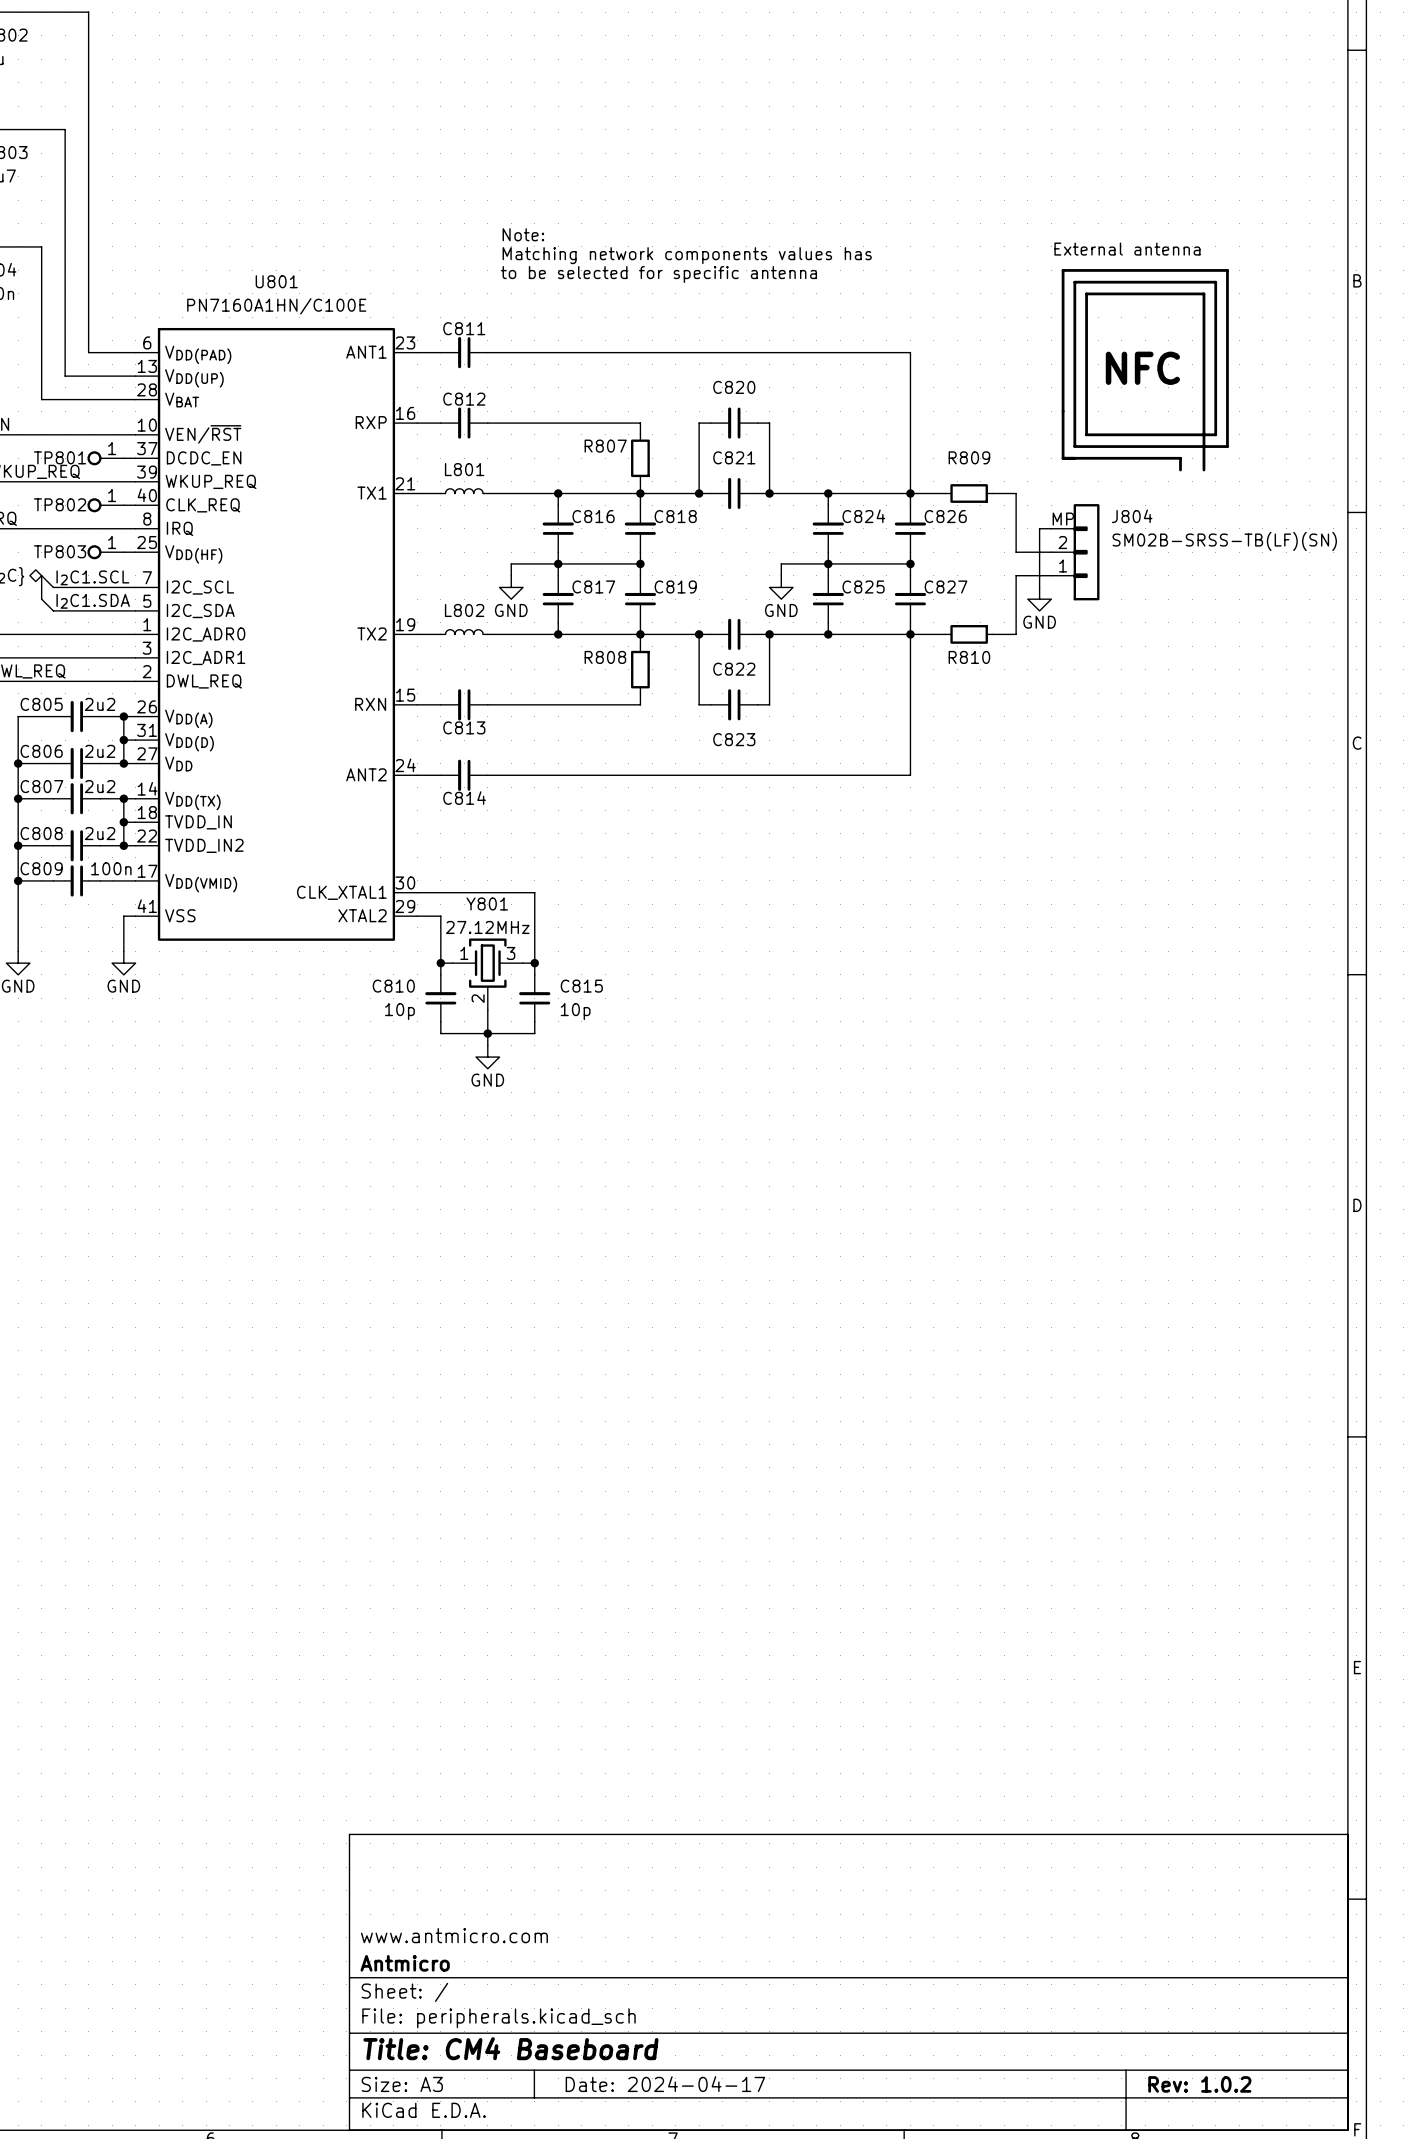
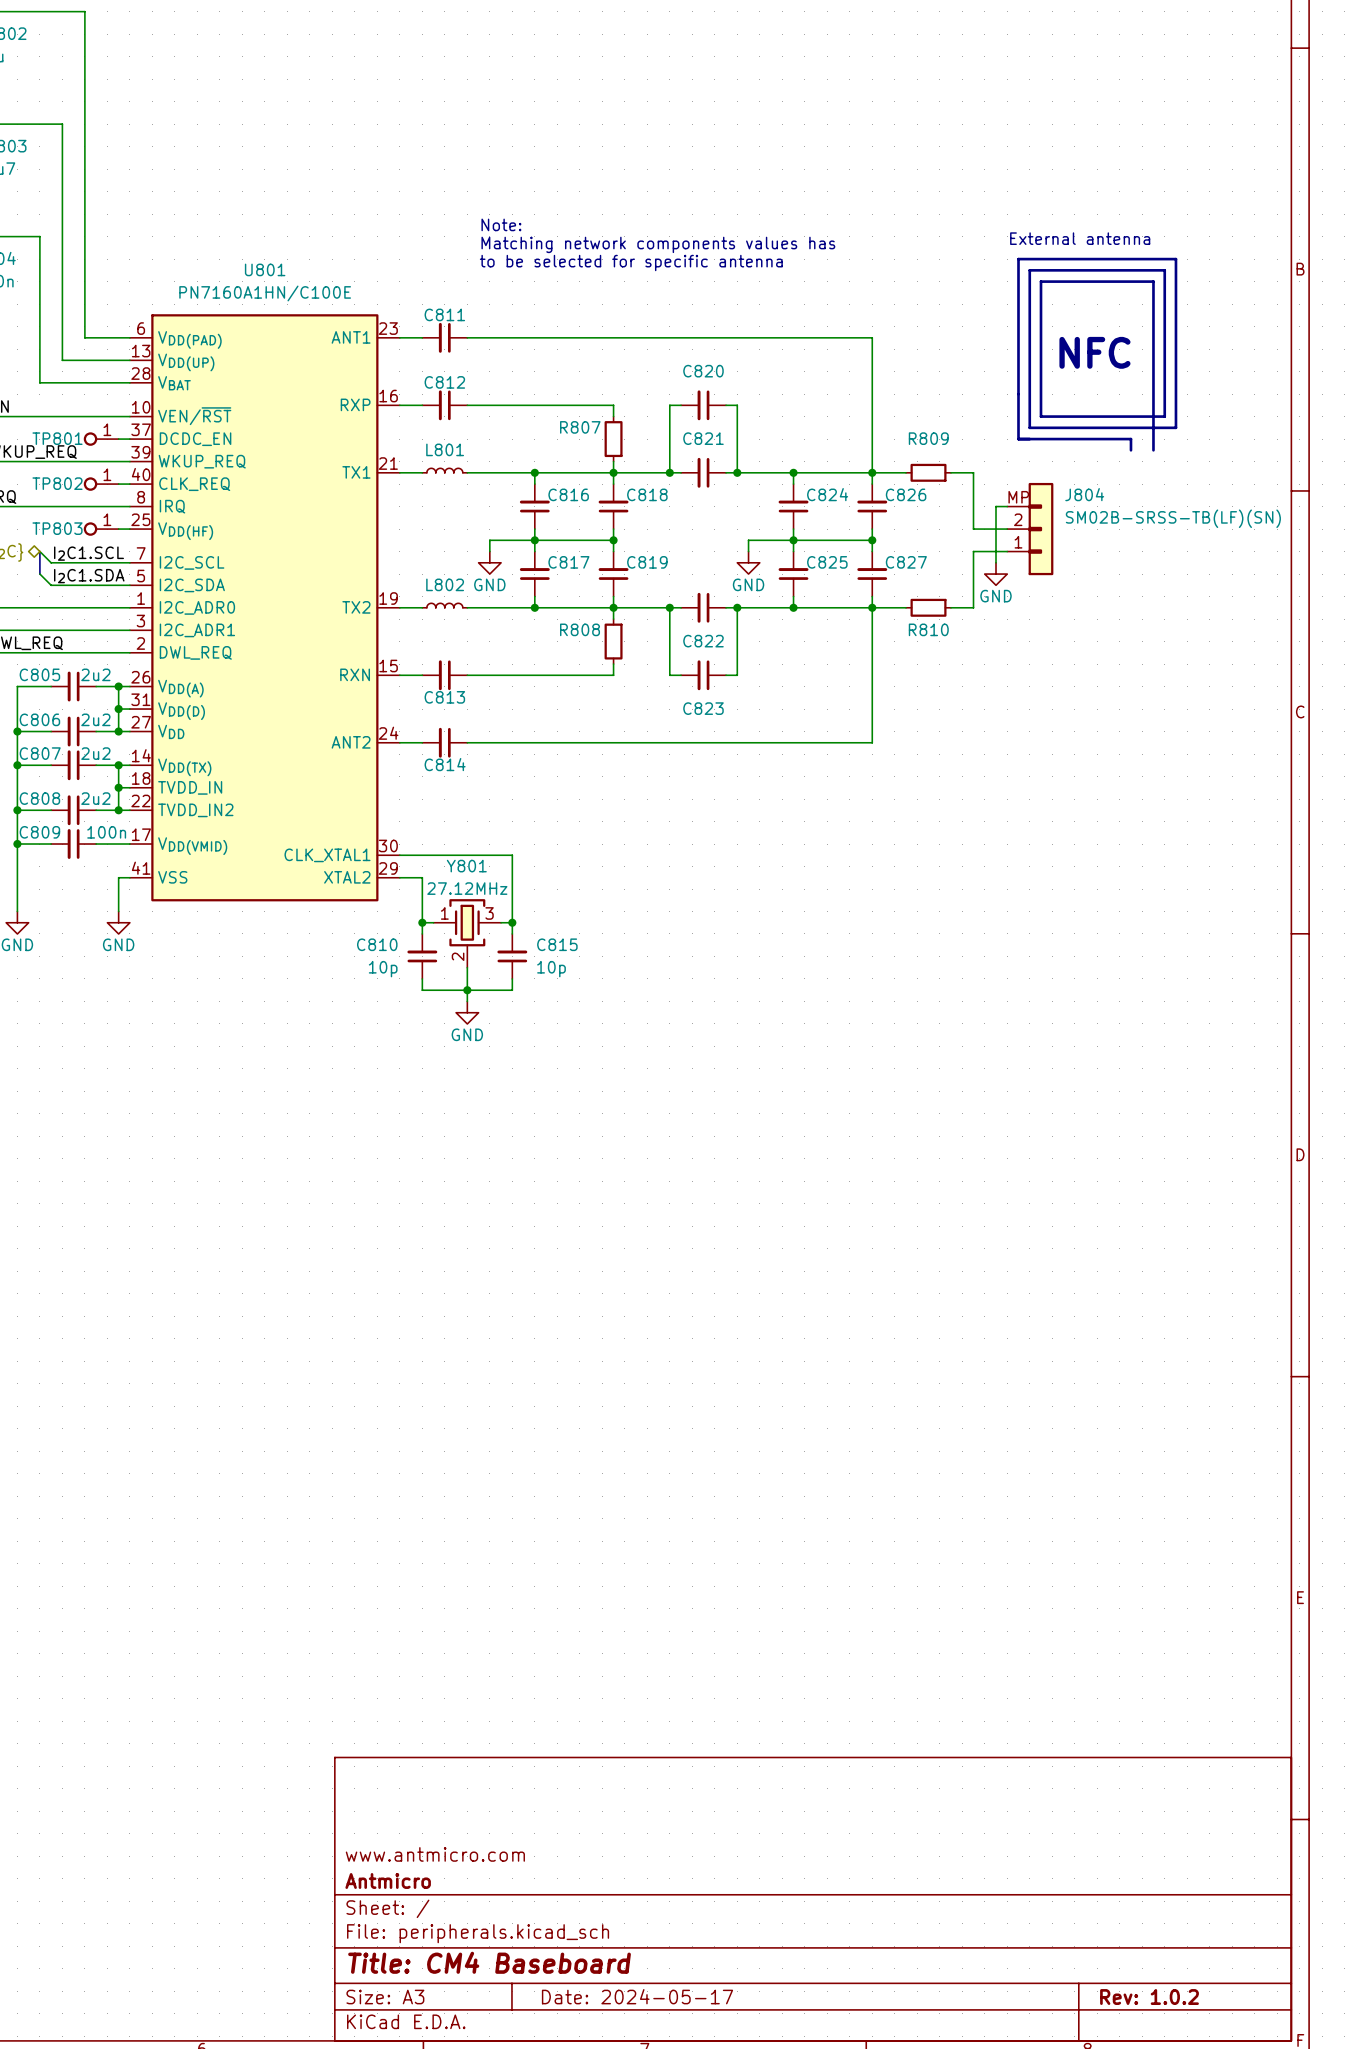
title block: Date: 2024-04-17 (665, 2084) -> Date: 2024-05-17 (637, 1996)

